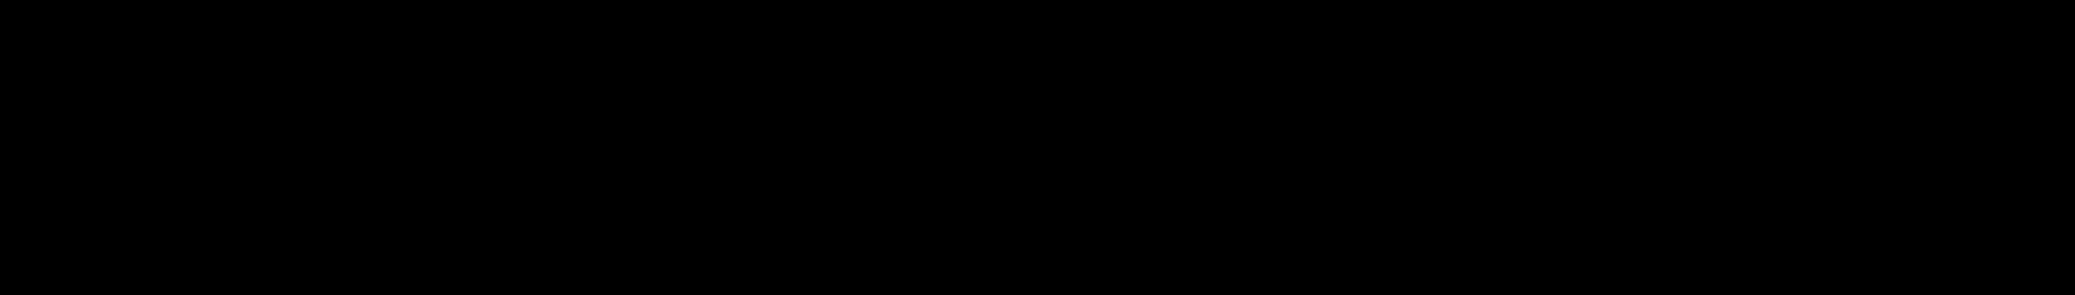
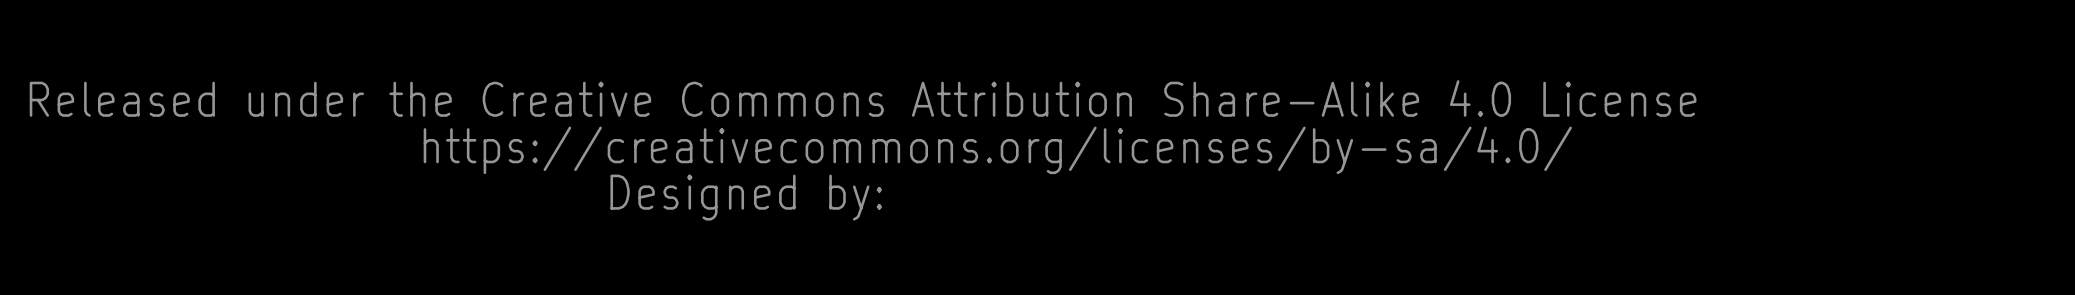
drawing: none -> [29, 80, 1697, 221]

